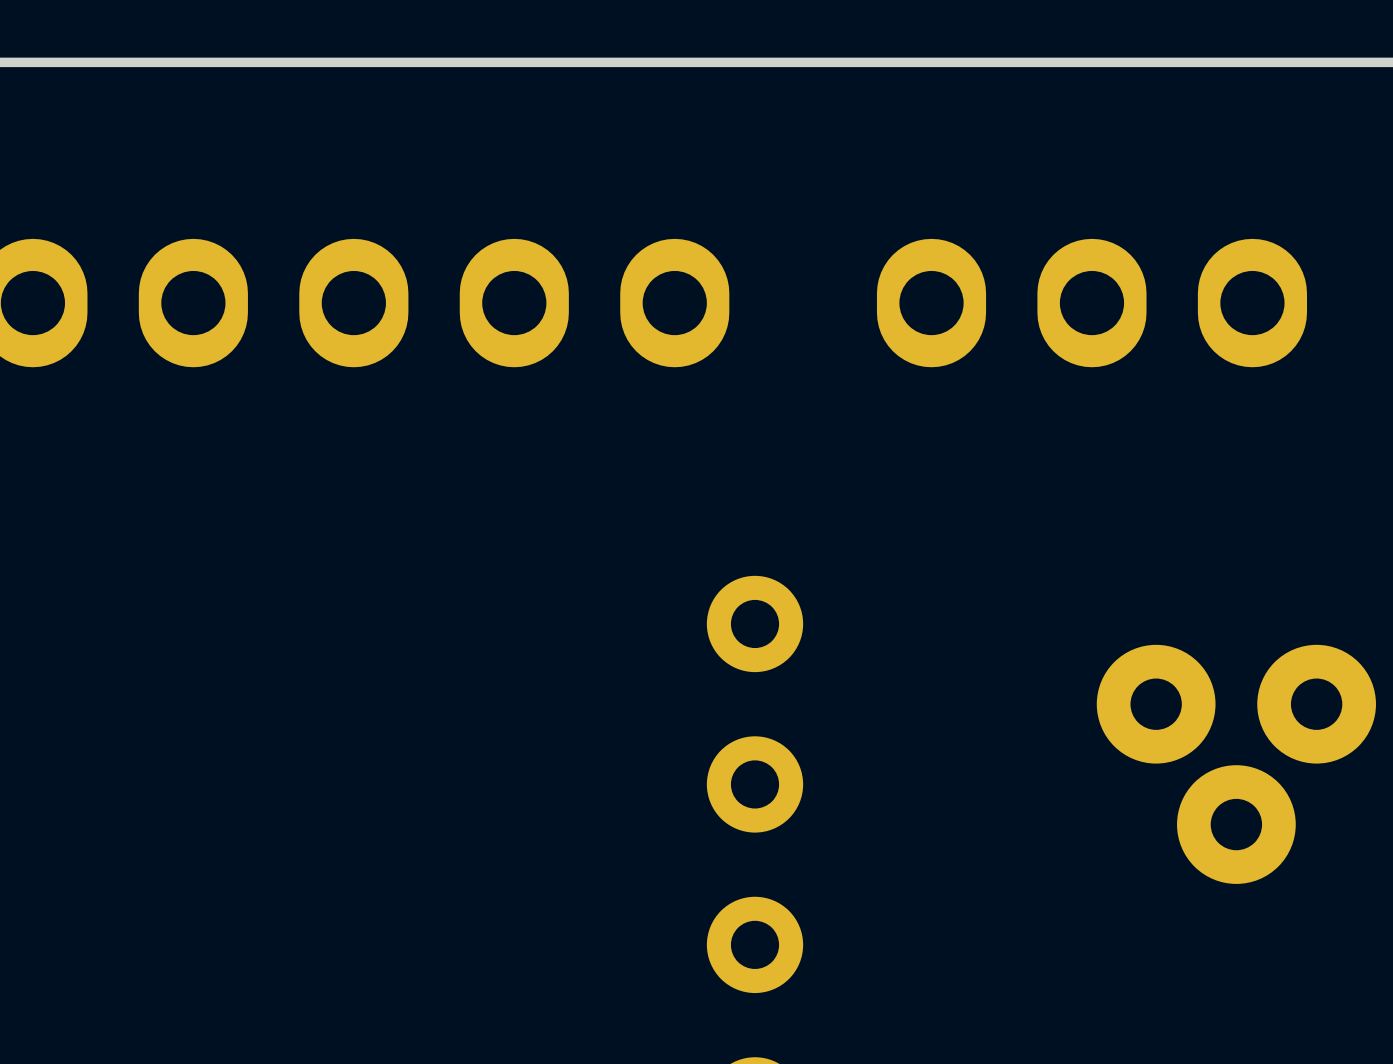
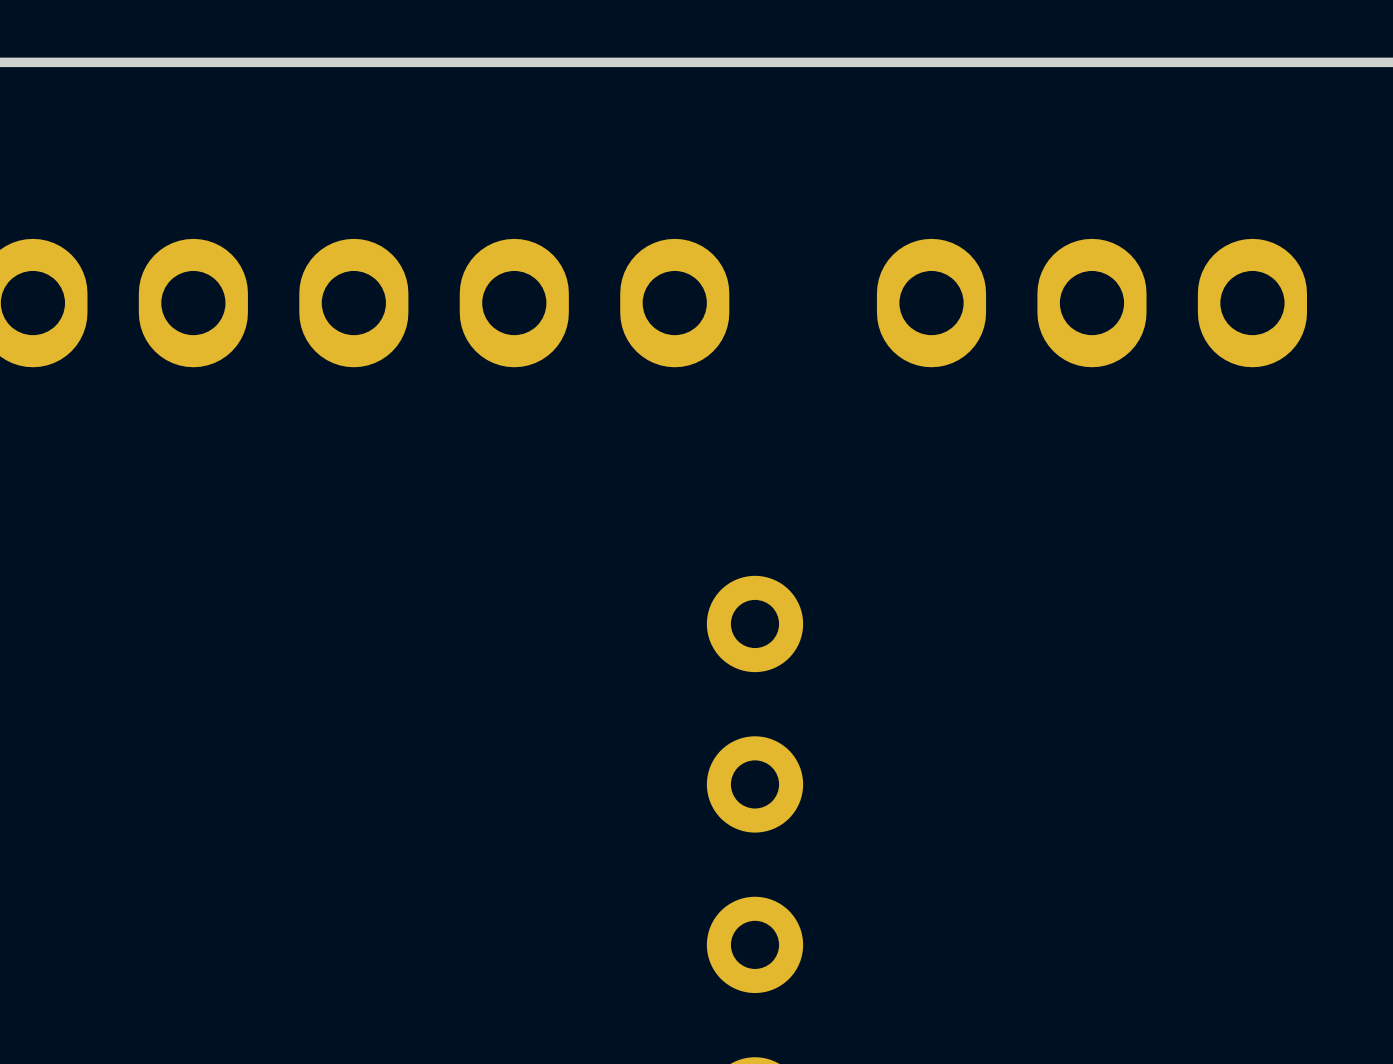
part: (1236, 764) -> none

